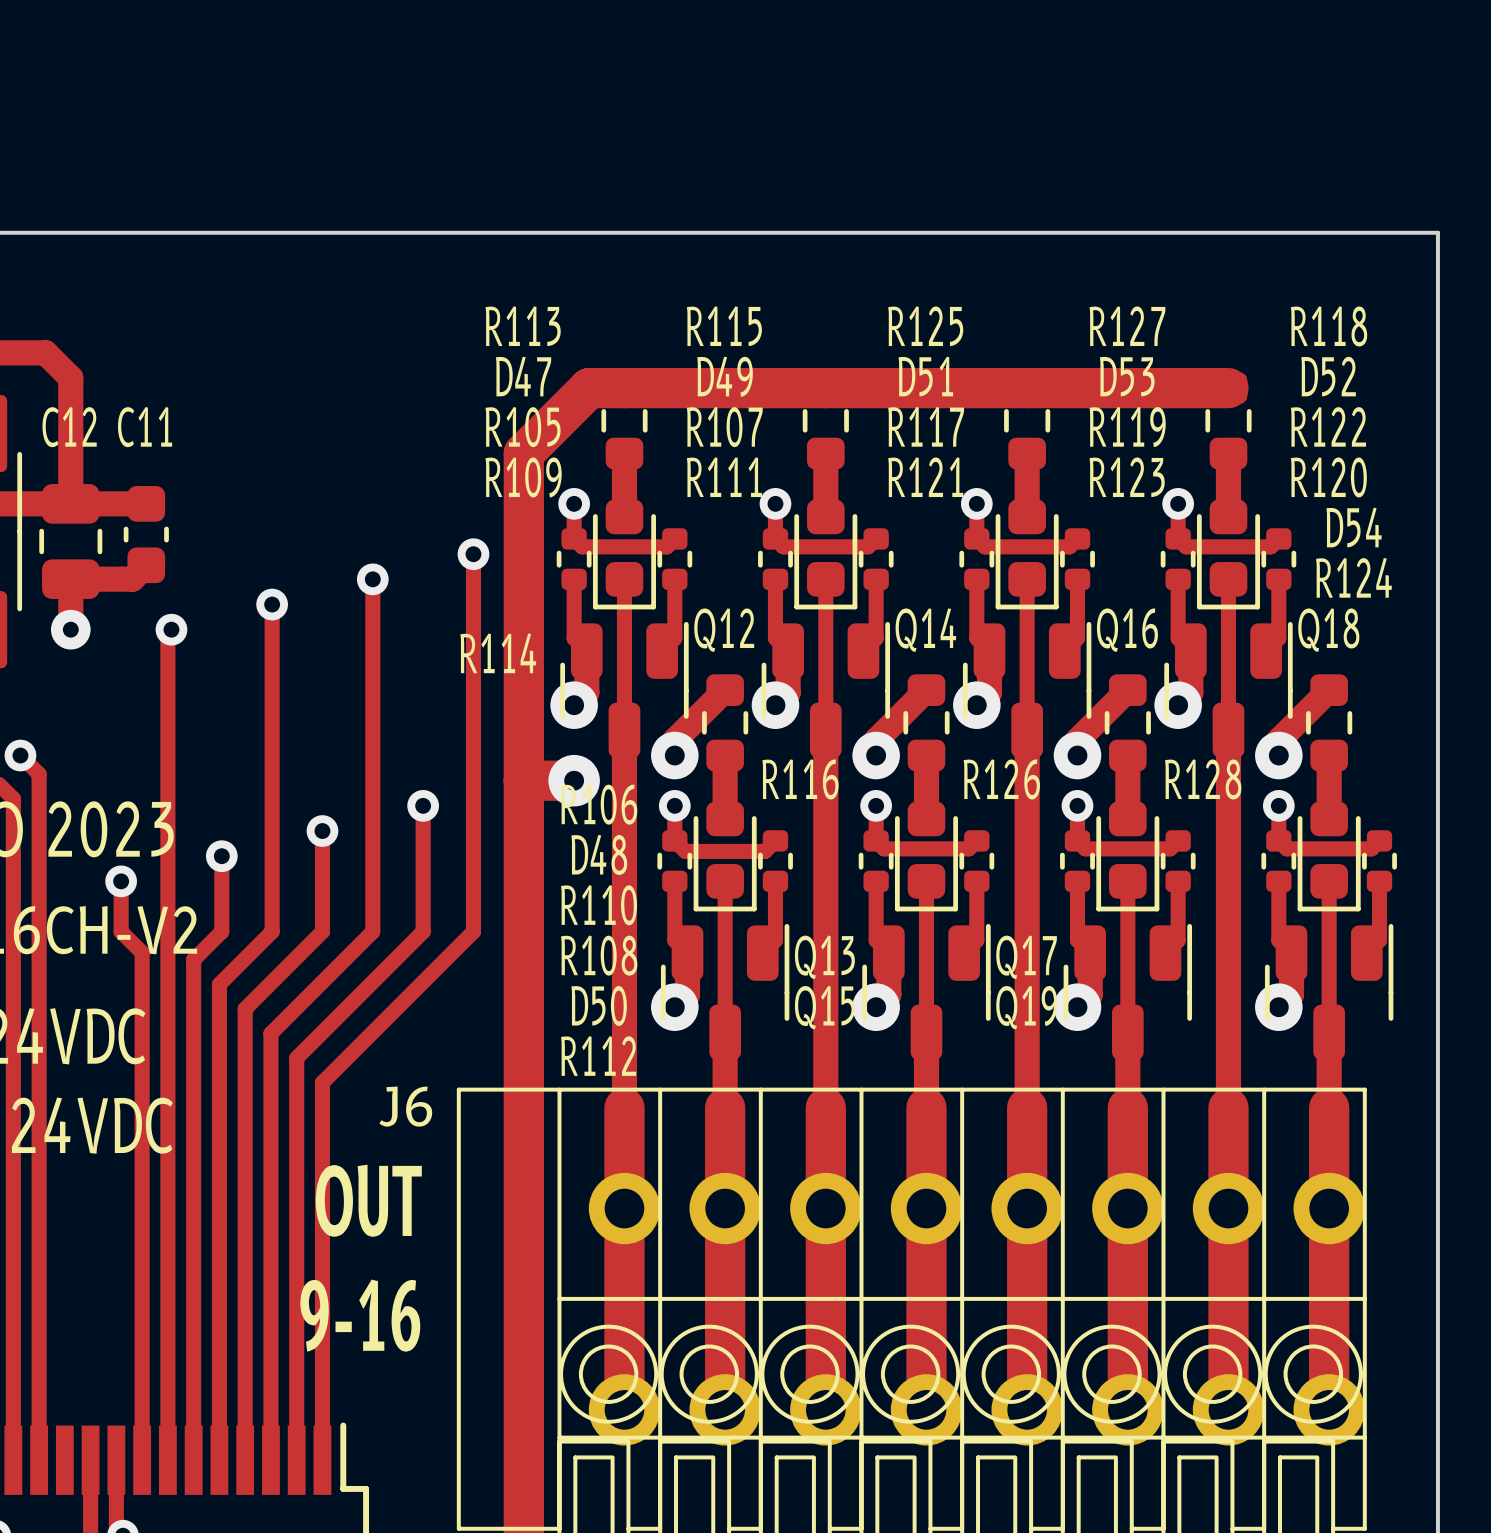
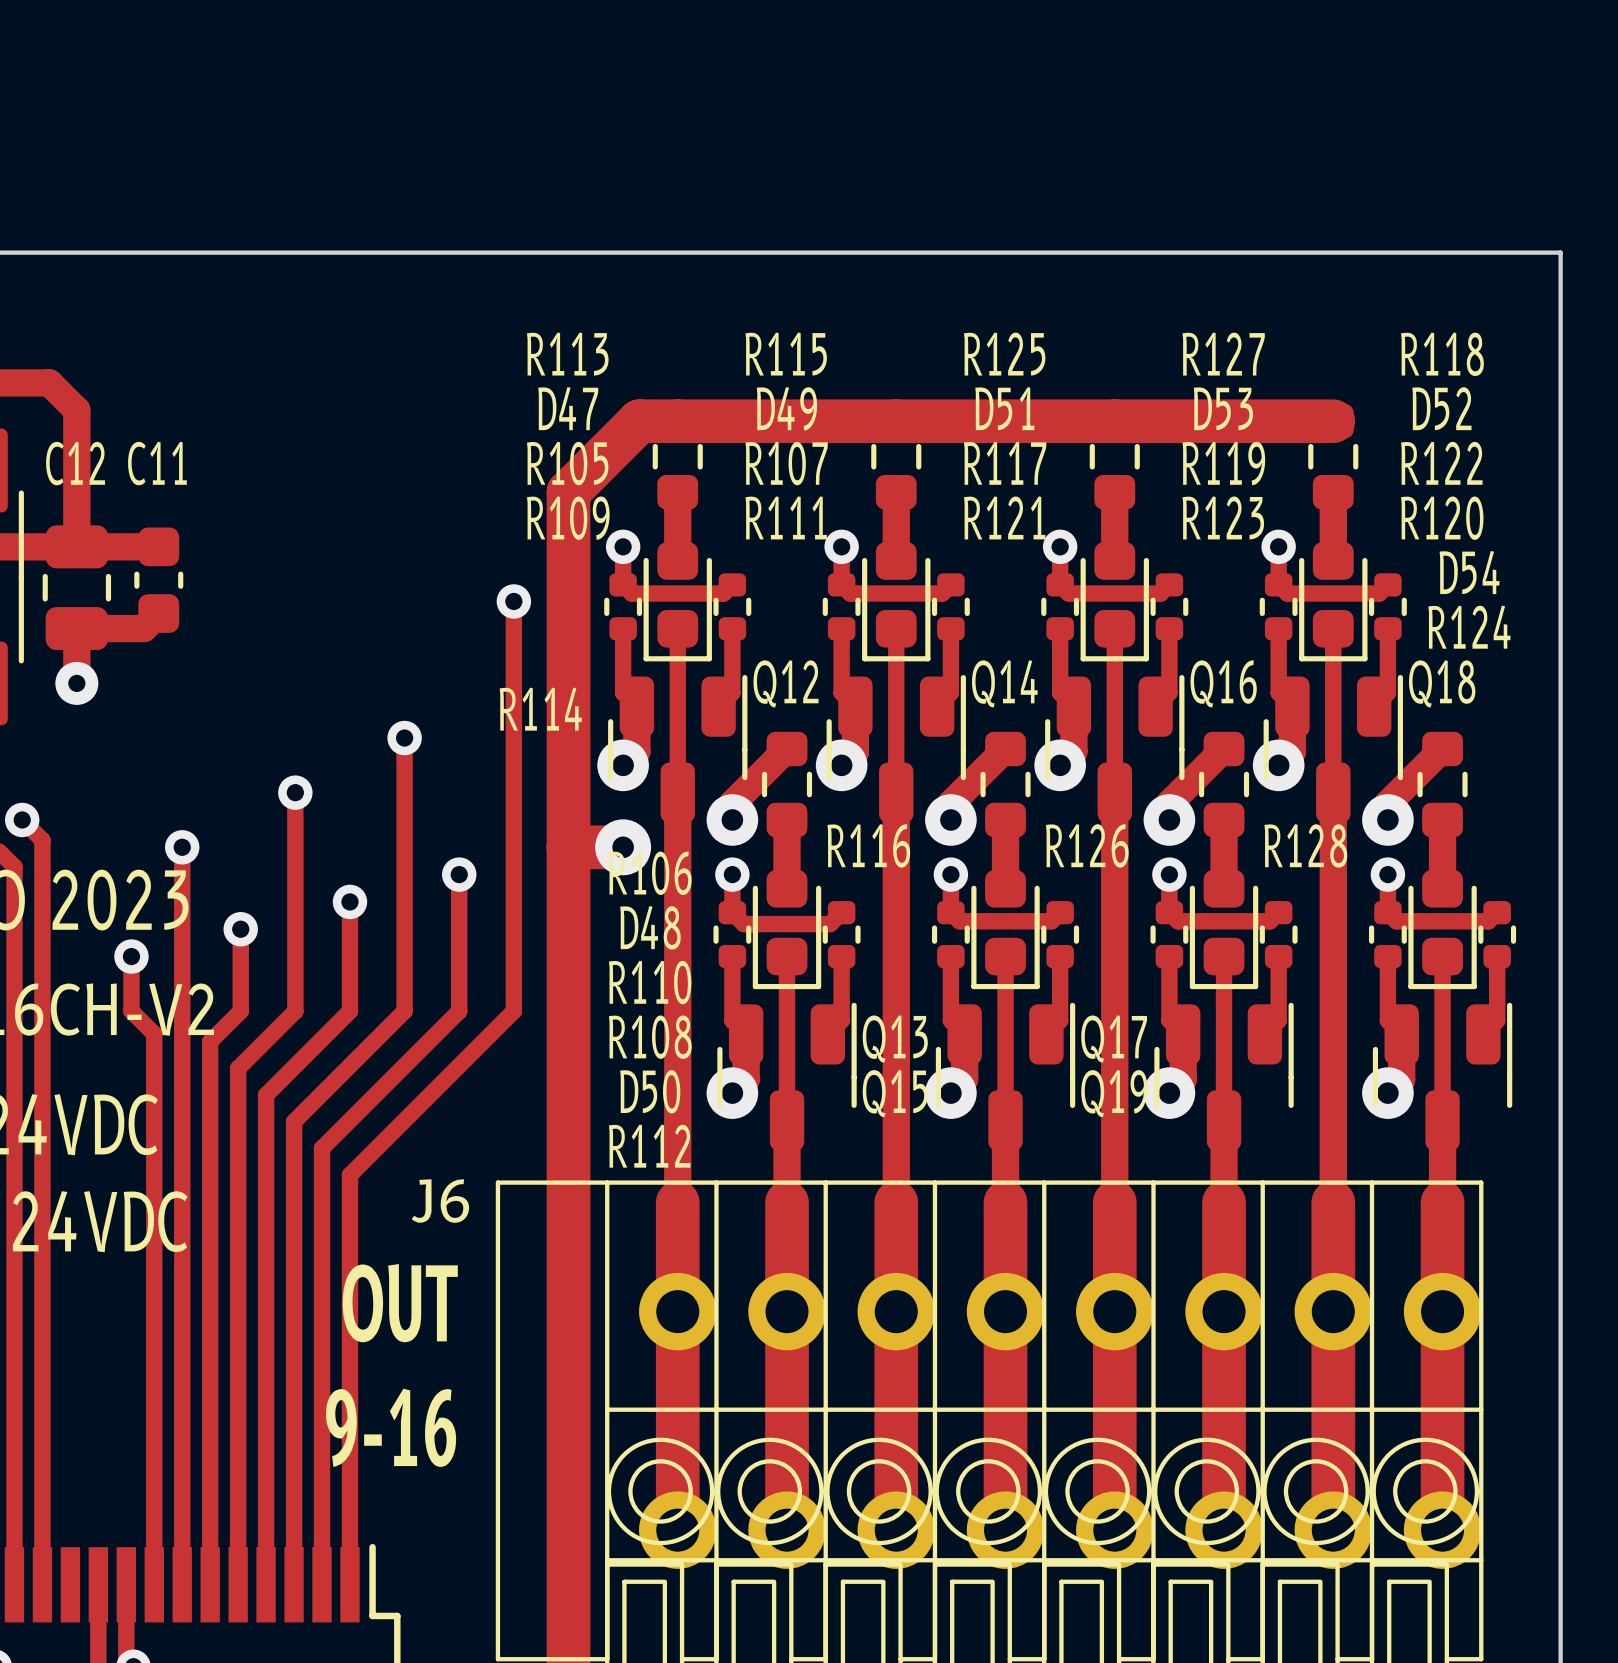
track: (372, 579) (372, 680) -> none
via: (372, 579) -> none
track: (272, 604) (272, 730) -> none
via: (272, 604) -> none
track: (171, 629) (167, 633) (167, 780) -> none
via: (171, 629) -> none
via: none -> (404, 738)
via: none -> (295, 792)
via: none -> (182, 847)

